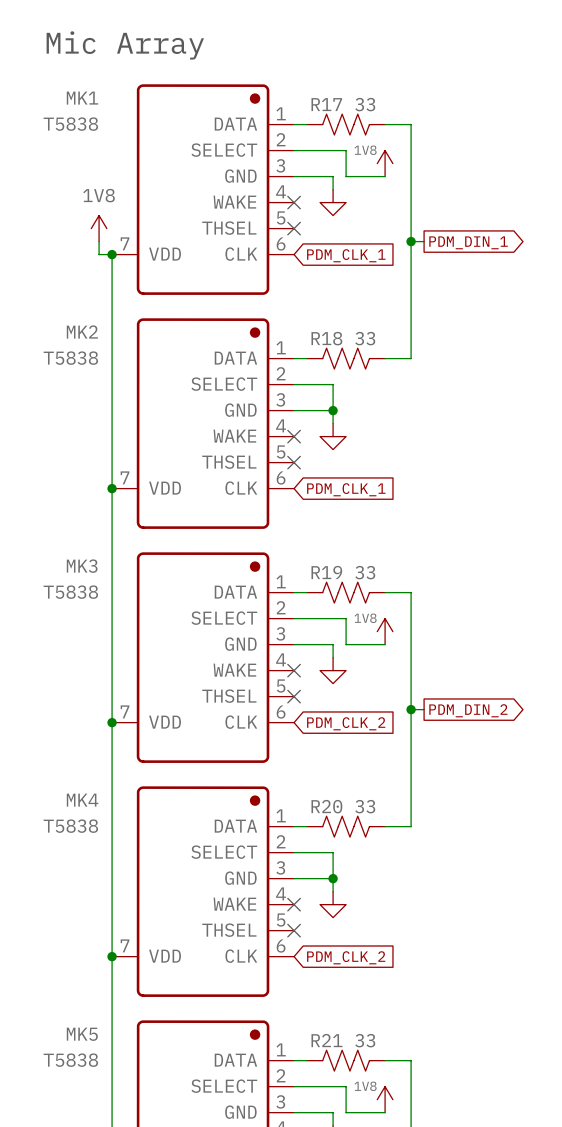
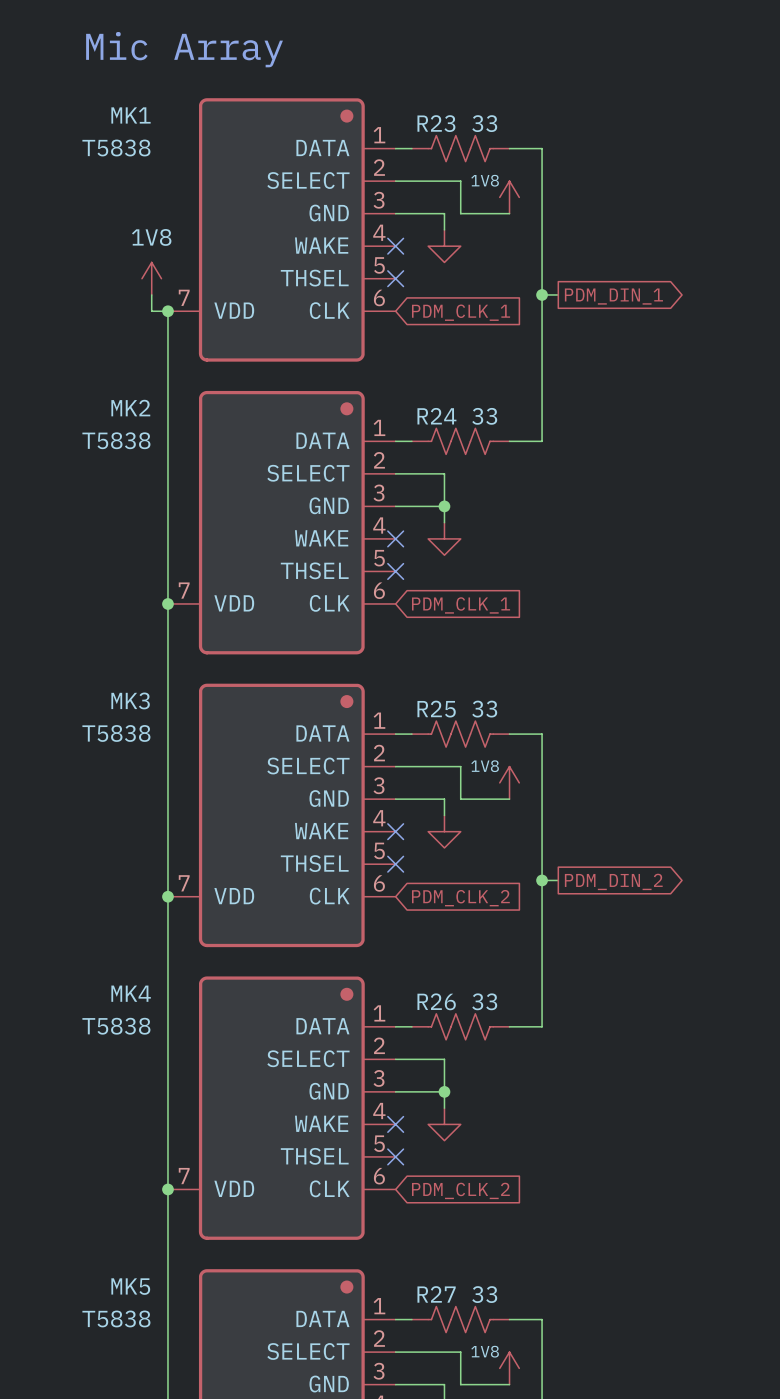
R17 name: R17 (326, 104) -> R23 (436, 123)
R18 name: R18 (326, 338) -> R24 (436, 416)
R19 name: R19 (326, 572) -> R25 (436, 709)
R20 name: R20 (326, 806) -> R26 (436, 1001)
R21 name: R21 (326, 1040) -> R27 (436, 1294)

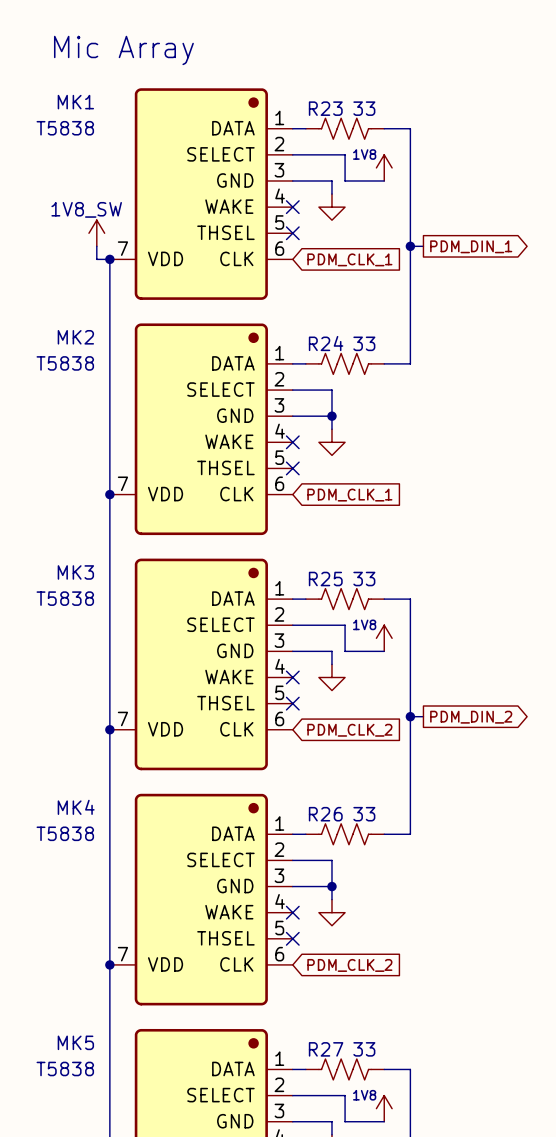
power symbol: 1V8 (151, 278) -> 1V8_SW (96, 233)

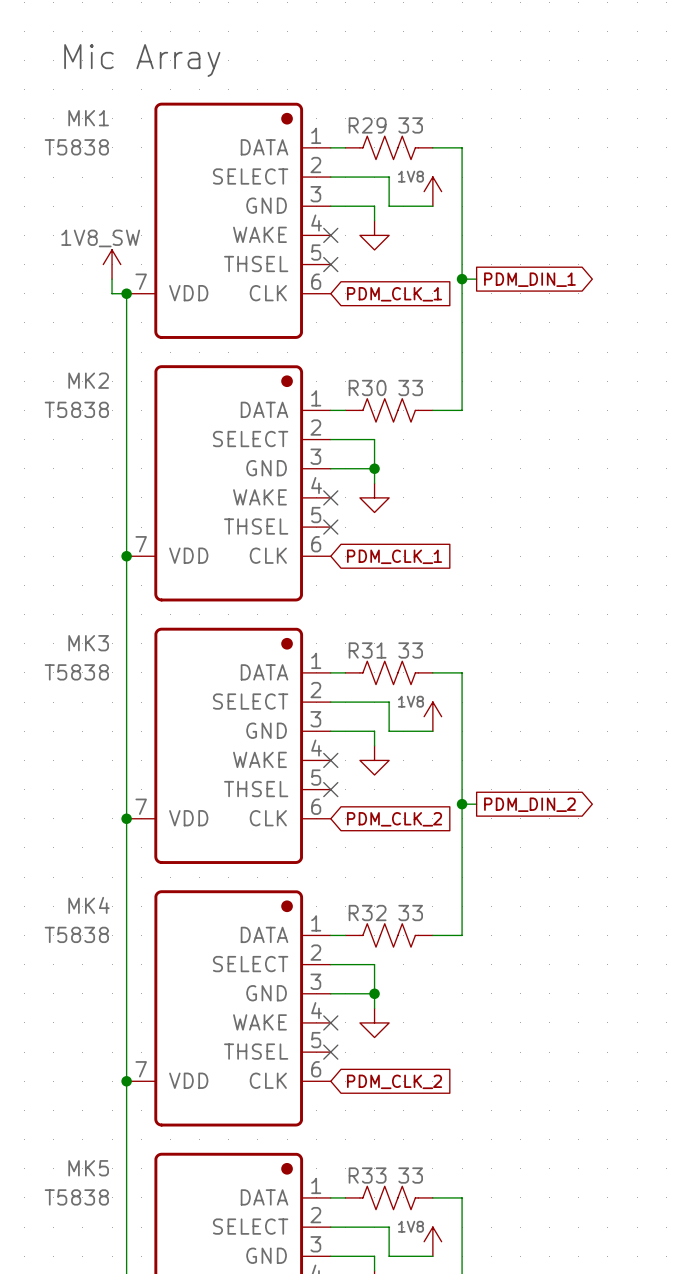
R23 name: R23 (325, 108) -> R29 (367, 125)
R24 name: R24 (326, 343) -> R30 (367, 387)
R25 name: R25 (325, 579) -> R31 (367, 650)
R26 name: R26 (325, 814) -> R32 (367, 913)
R27 name: R27 (326, 1049) -> R33 (367, 1175)

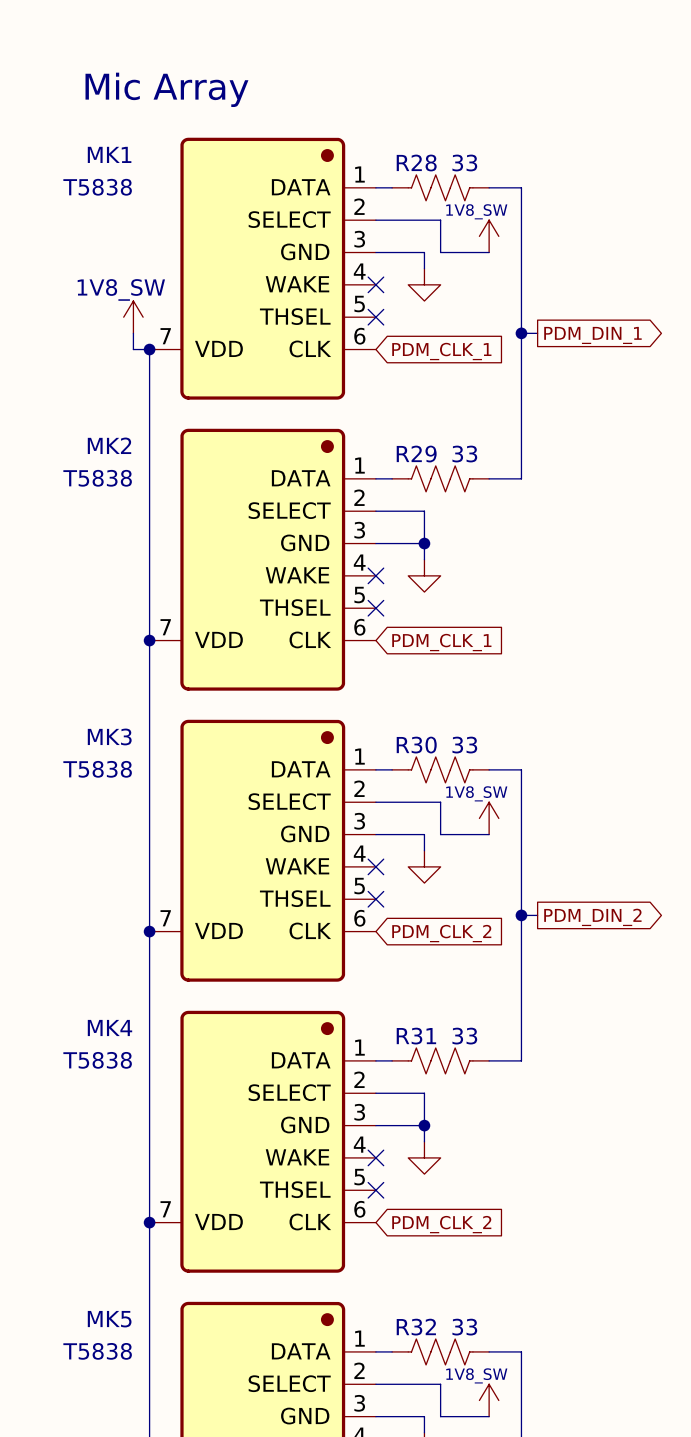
R29 name: R29 (367, 125) -> R28 (416, 163)
power symbol: 1V8 (432, 191) -> 1V8_SW (489, 236)
R30 name: R30 (367, 387) -> R29 (416, 454)
R31 name: R31 (367, 650) -> R30 (416, 745)
power symbol: 1V8 (432, 716) -> 1V8_SW (489, 818)
R32 name: R32 (367, 913) -> R31 (416, 1036)
R33 name: R33 (367, 1175) -> R32 (416, 1327)
power symbol: 1V8 (432, 1241) -> 1V8_SW (489, 1400)

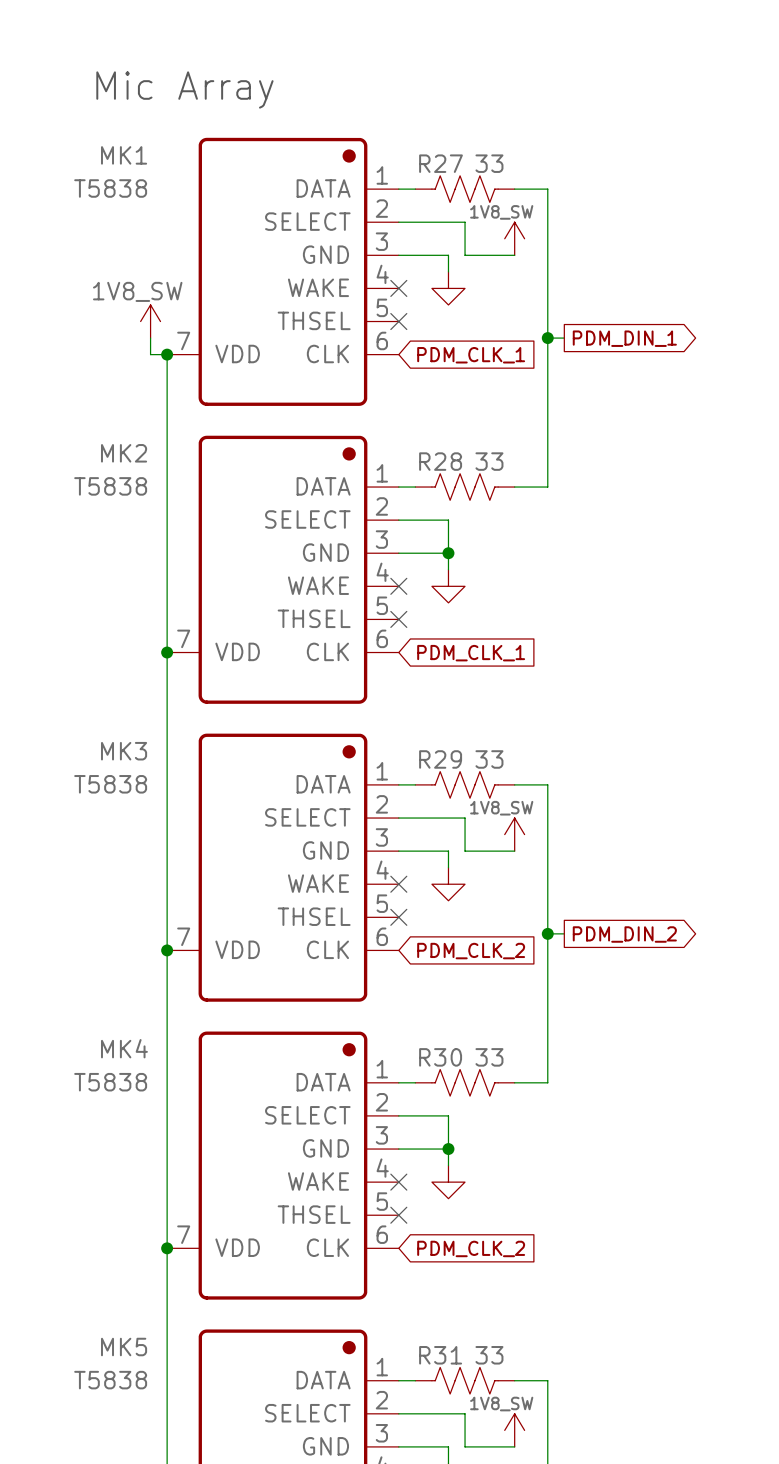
R28 name: R28 (416, 163) -> R27 (440, 163)
R29 name: R29 (416, 454) -> R28 (440, 461)
R30 name: R30 (416, 745) -> R29 (440, 759)
R31 name: R31 (416, 1036) -> R30 (440, 1057)
R32 name: R32 (416, 1327) -> R31 (440, 1355)

